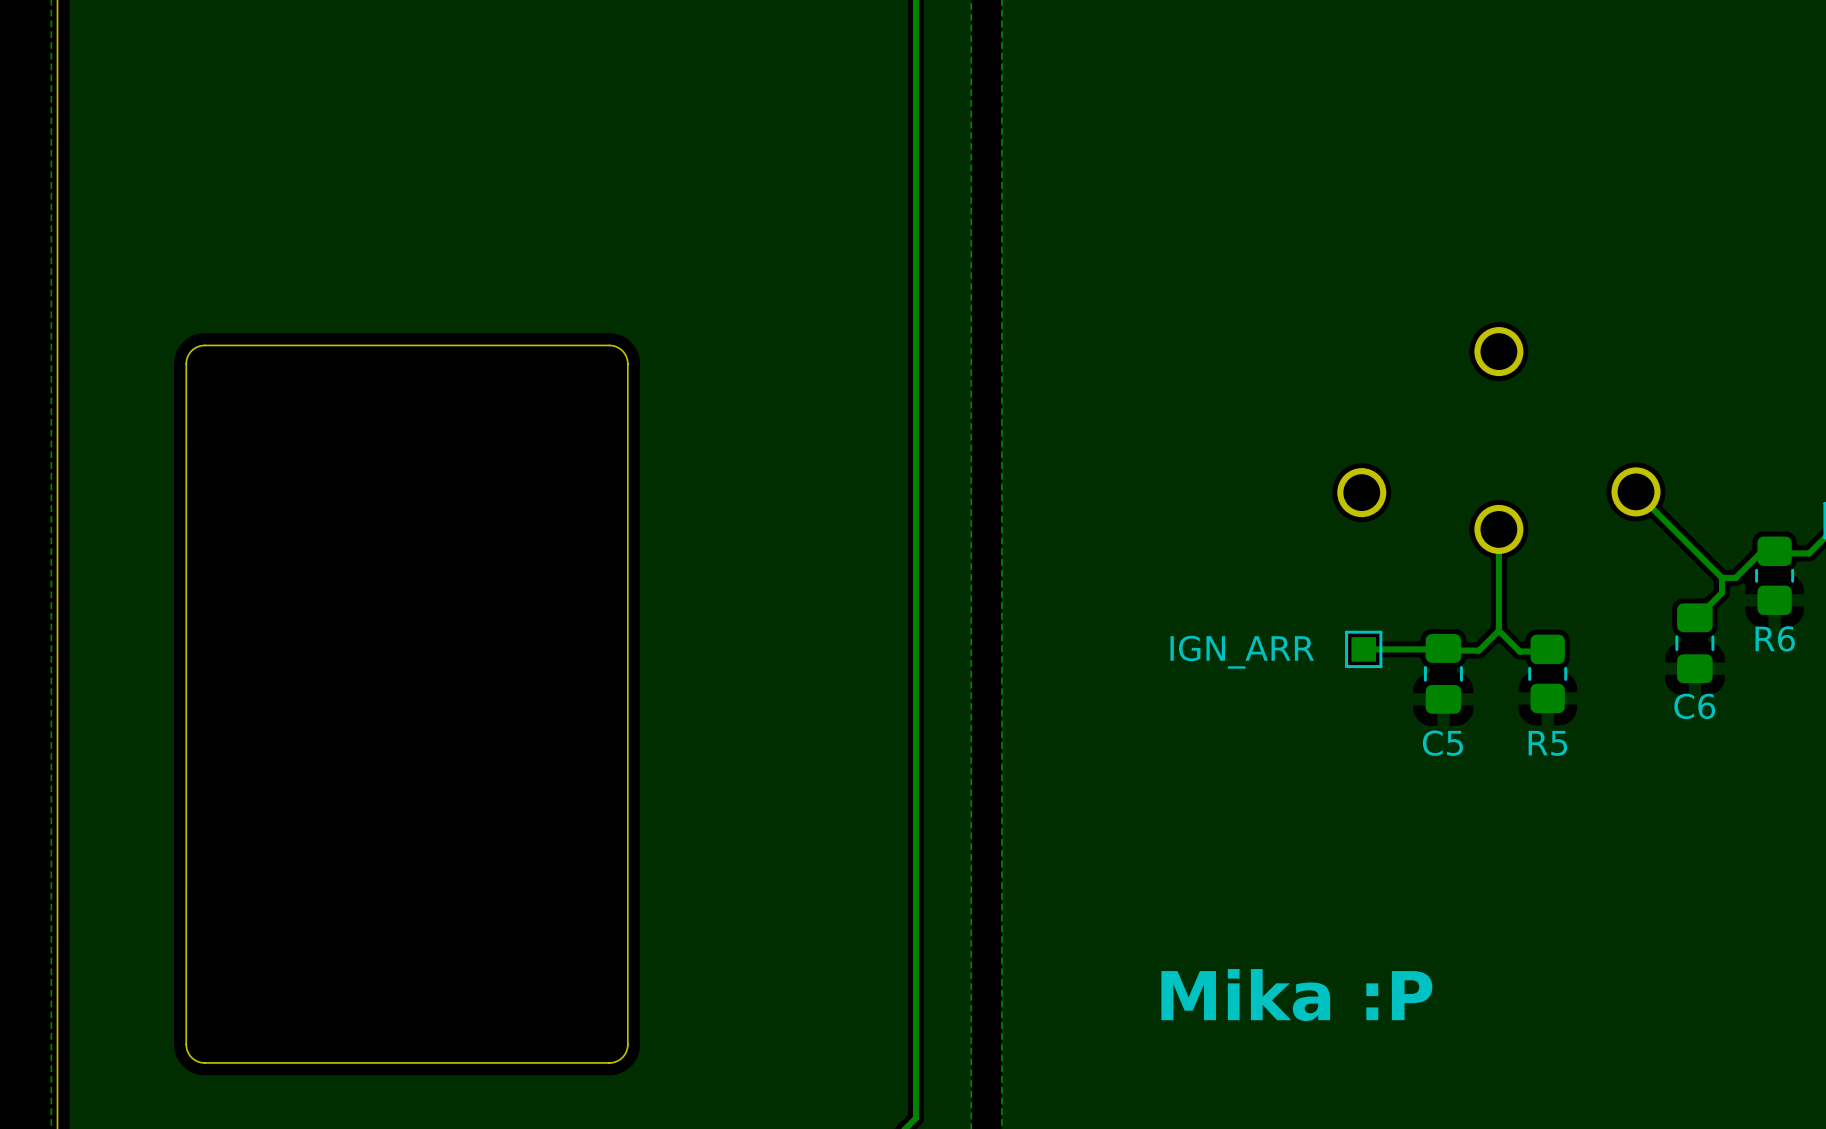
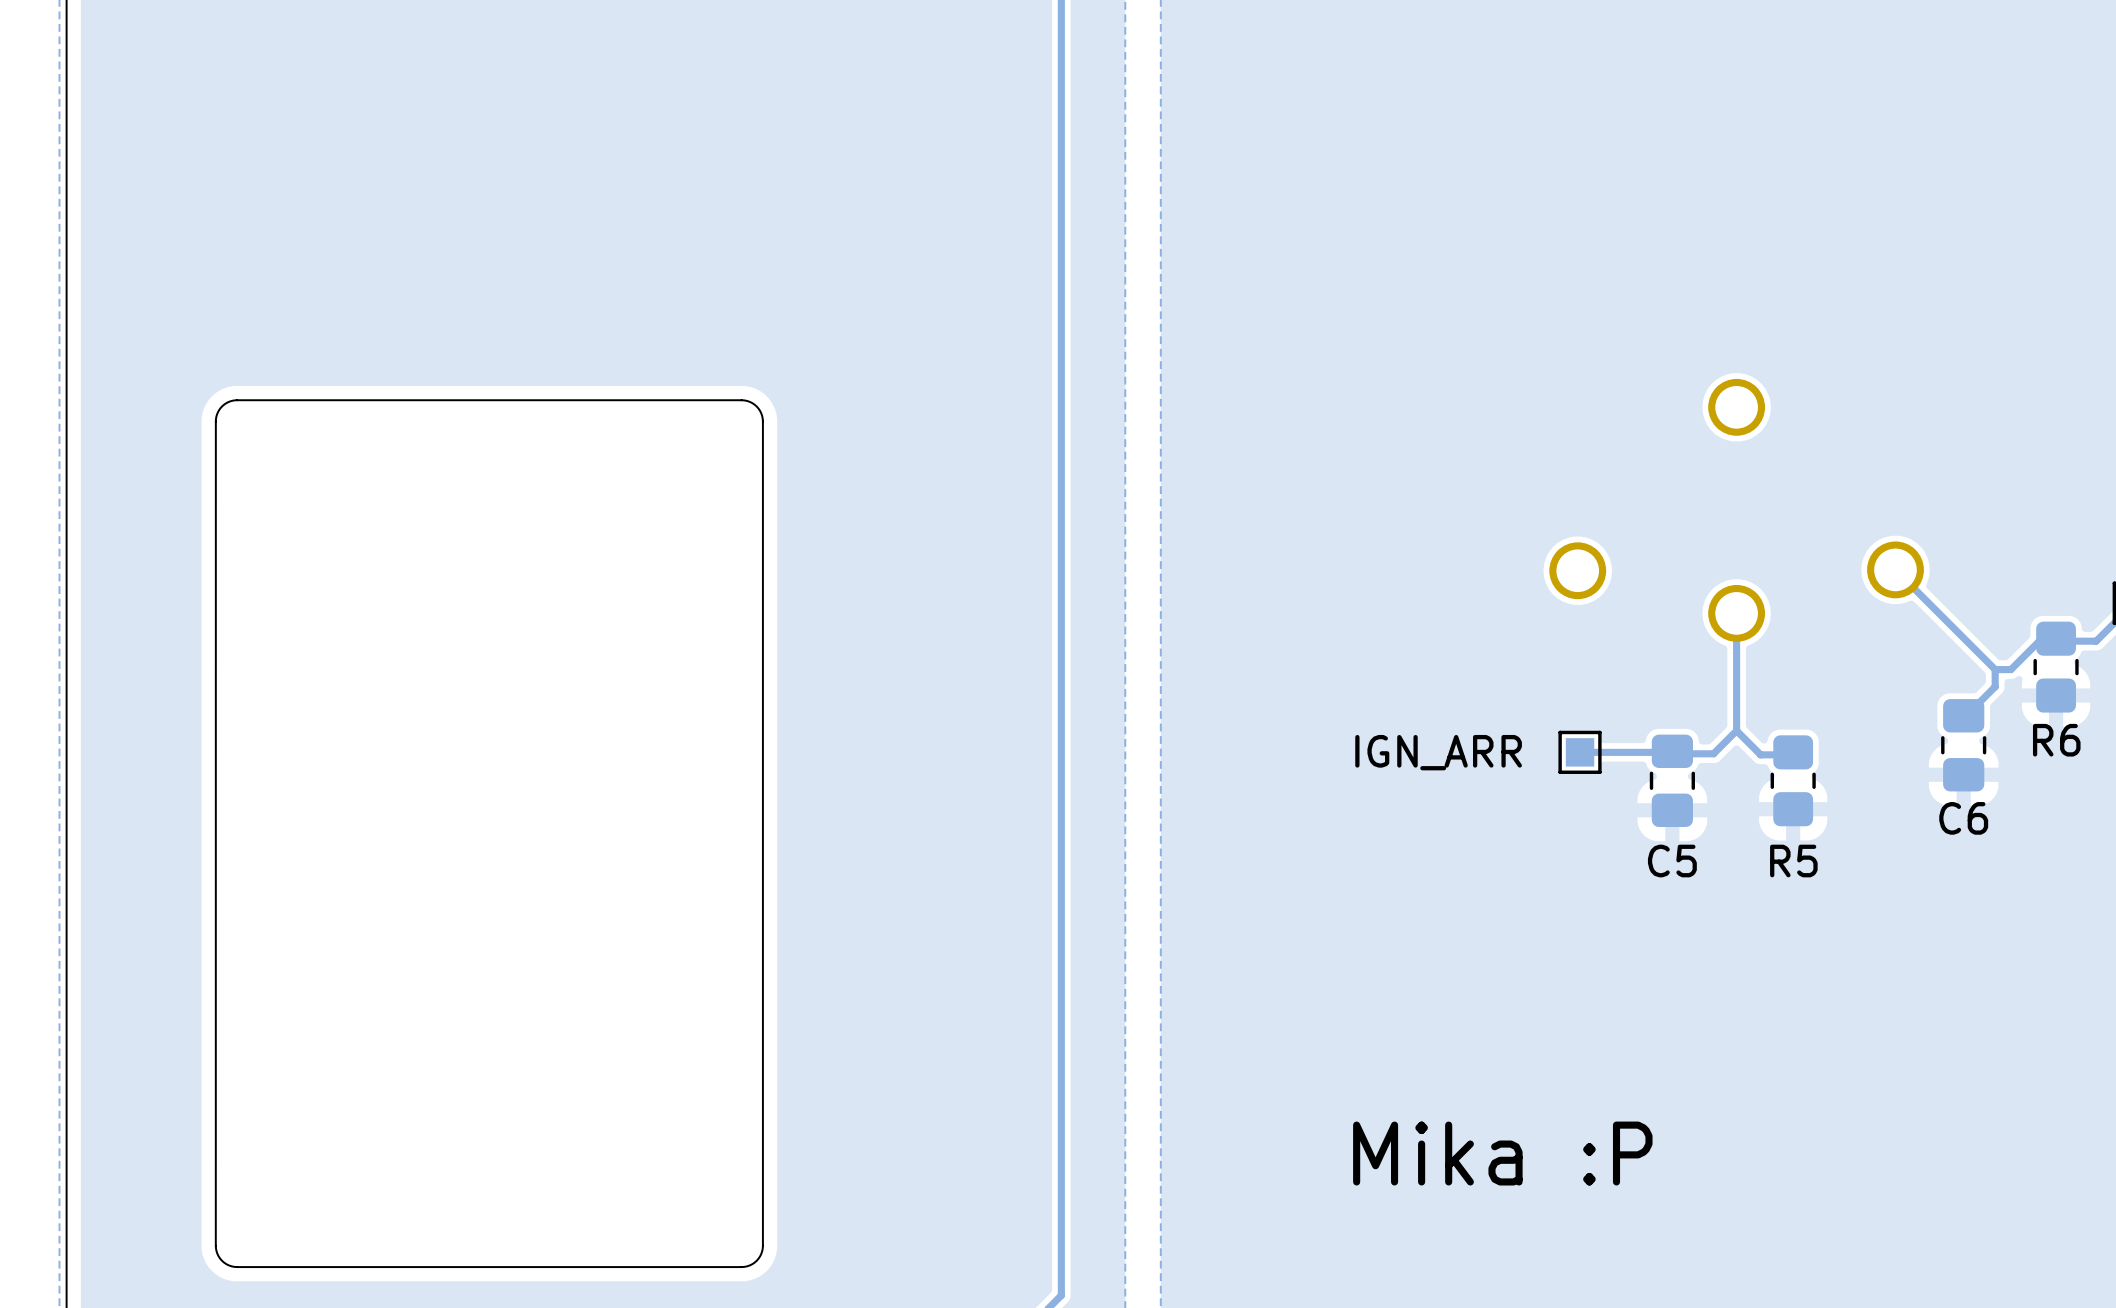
board edge: (609, 345) (622, 350) (627, 363) (627, 1044) (625, 1054) (617, 1061) (609, 1062) (204, 1062) (191, 1057) (186, 1044) -> (706, 400) (749, 401) (760, 410) (762, 421) (762, 1245) (760, 1256) (752, 1264) (741, 1267) (234, 1266) (224, 1262) (216, 1251) (215, 1210)

